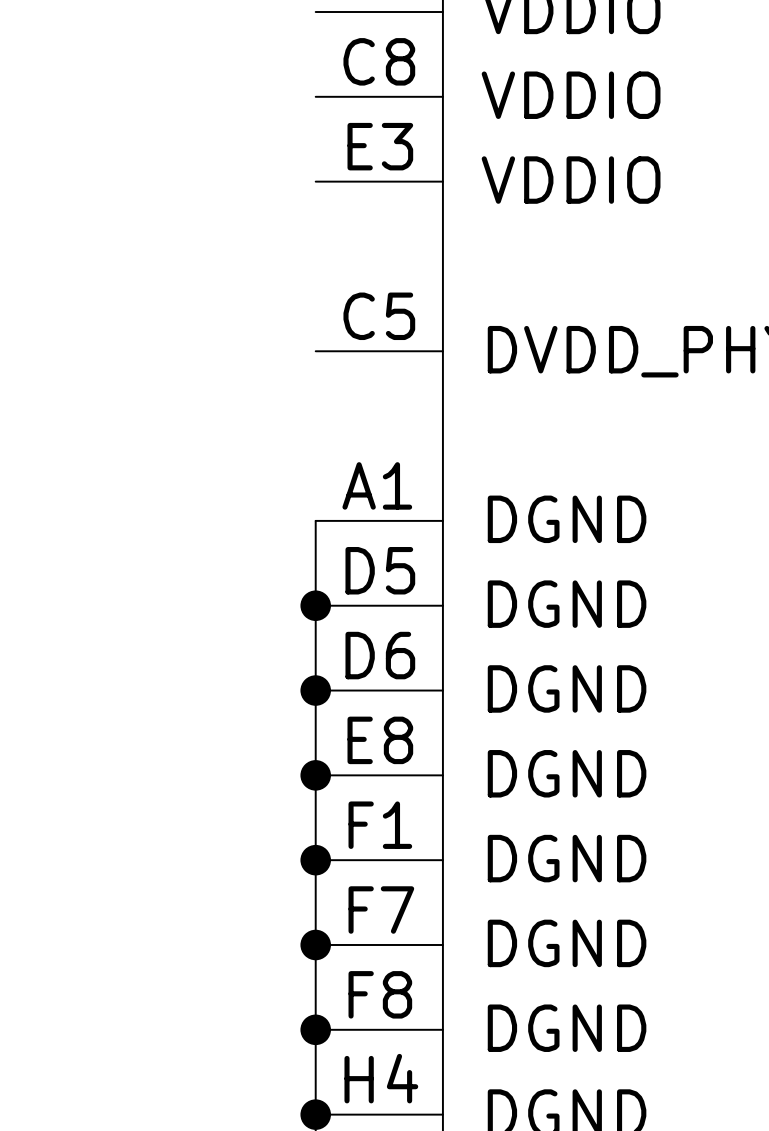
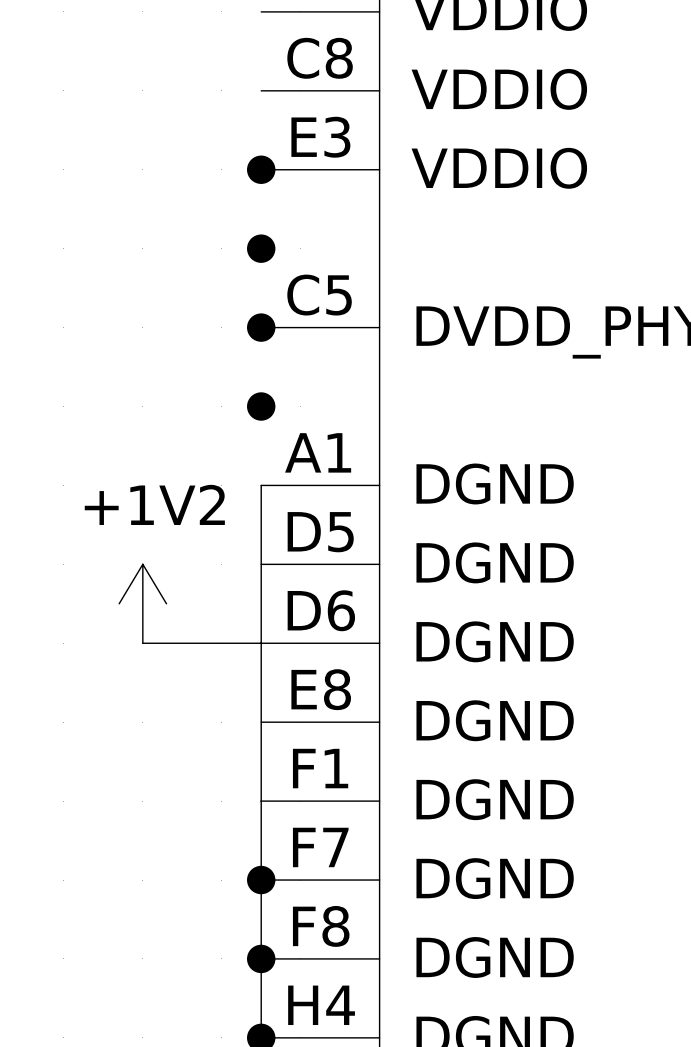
junction: none -> (261, 169)
junction: none -> (261, 248)
junction: none -> (261, 327)
junction: none -> (261, 406)
junction: (315, 605) -> none
power symbol: none -> +1V2 (142, 603)
wire: none -> (142, 643) (261, 643)
junction: (315, 690) -> none
junction: (315, 775) -> none
junction: (315, 860) -> none

